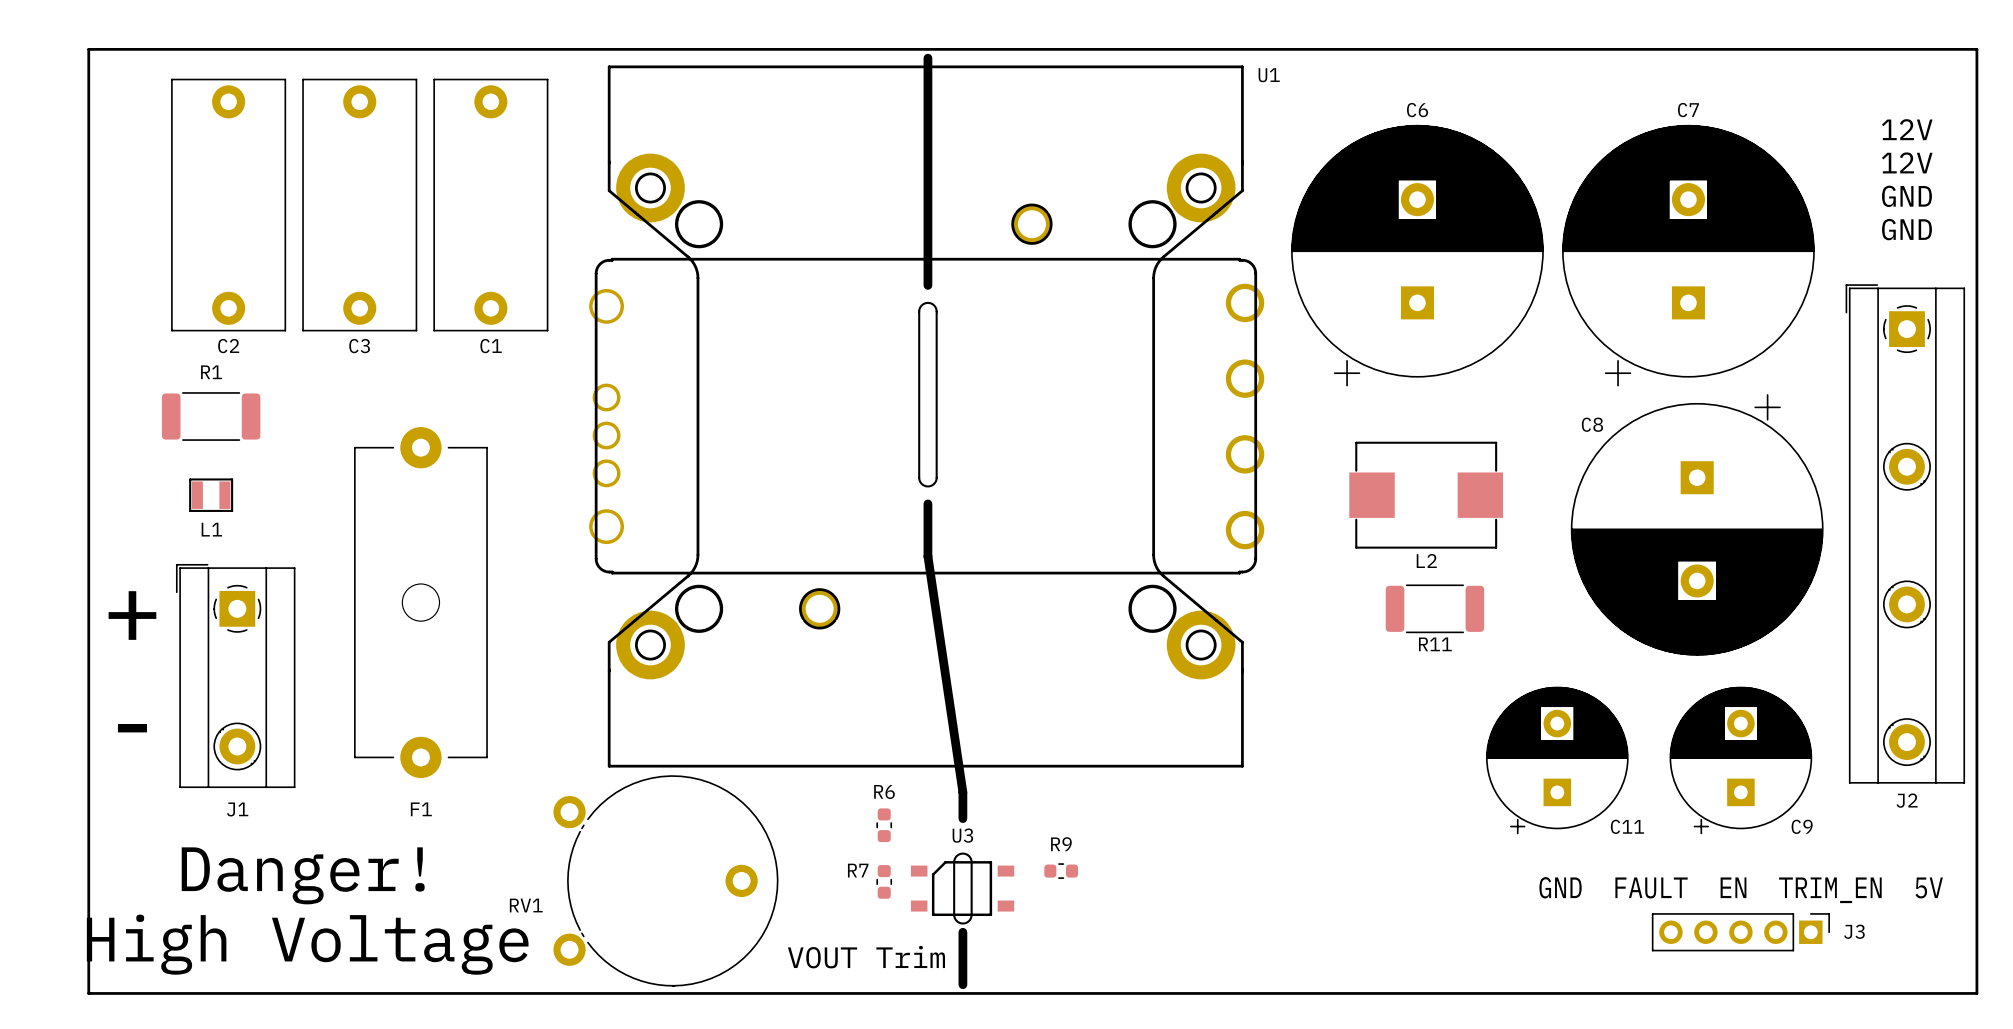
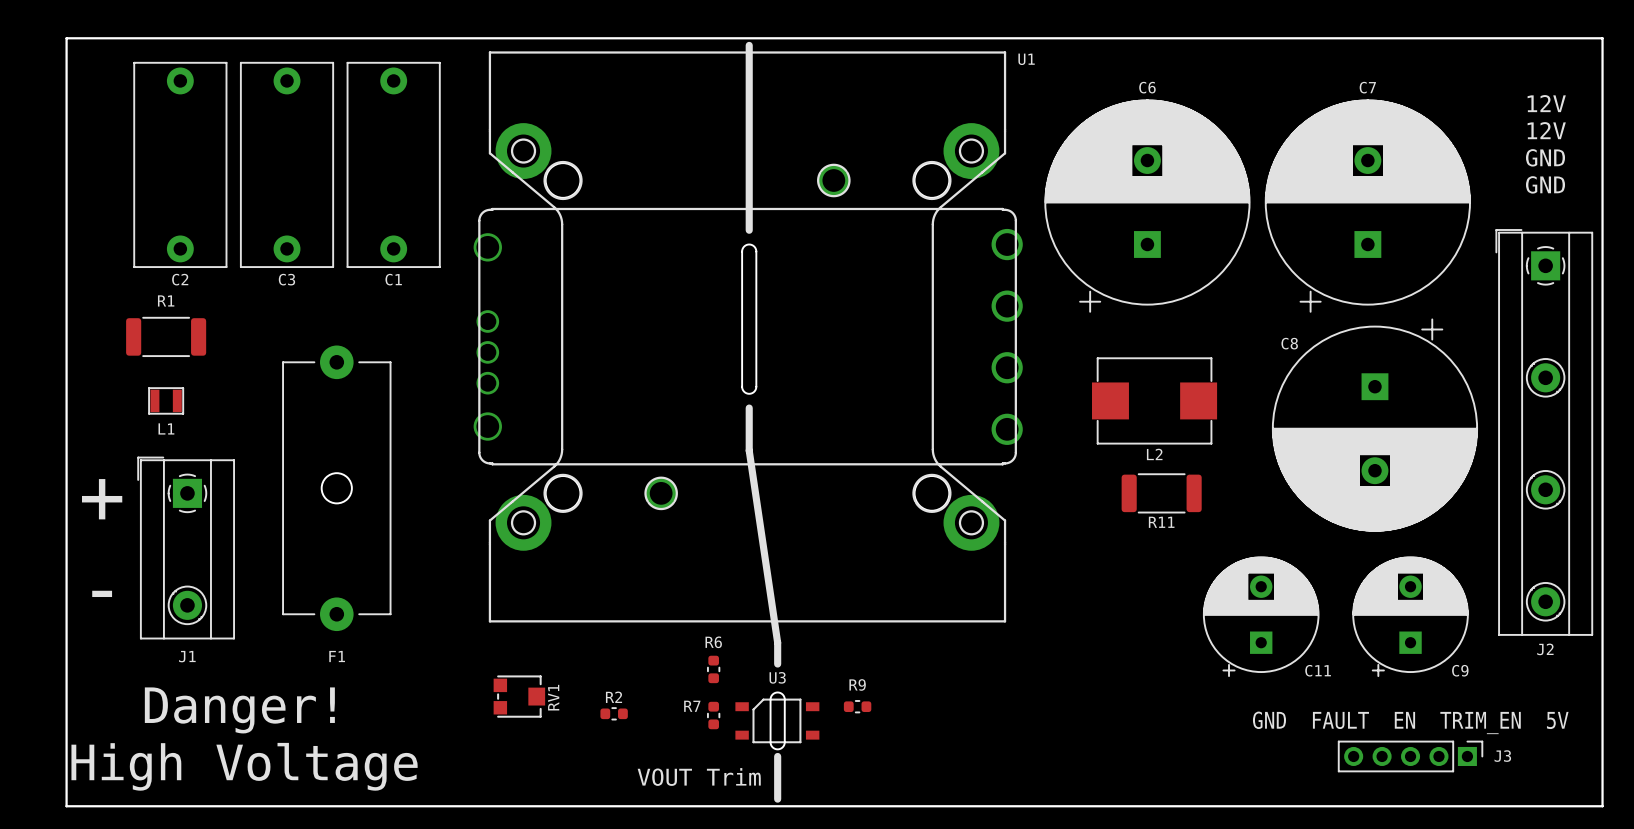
RV1 footprint: [553, 775, 779, 987] -> [493, 675, 546, 718]
R2: none -> (614, 713)
RV1 name position: RV1 (526, 905) -> RV1 (553, 697)

